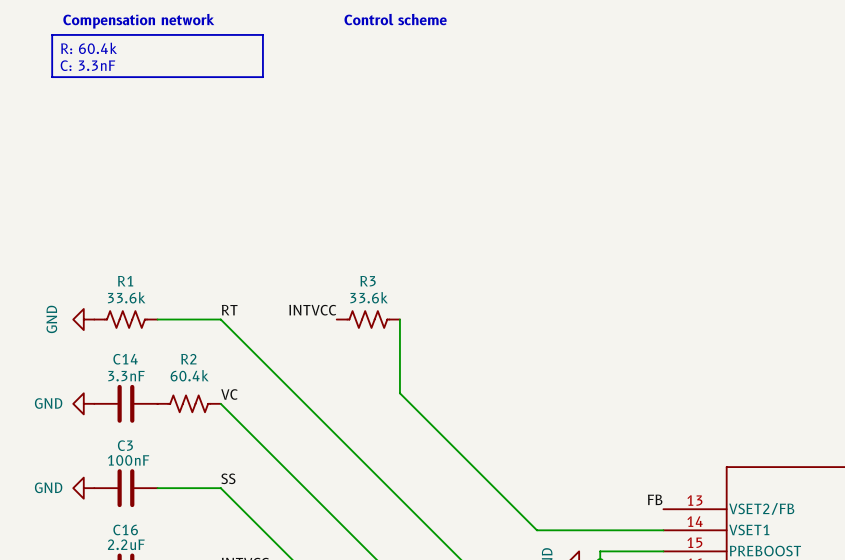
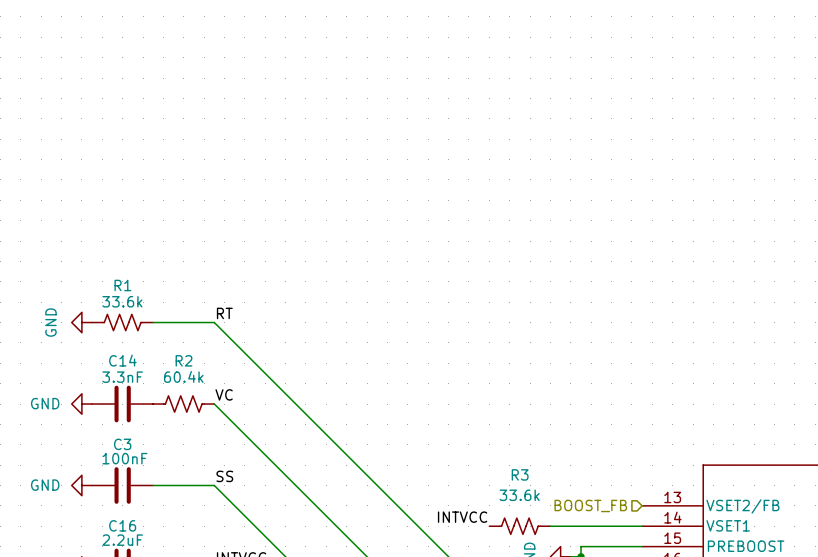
text: Control scheme (395, 19) -> none
text: Compensation network (138, 21) -> none
line: (52, 34) (262, 34) (262, 77) (52, 77) (52, 34) -> none
text: R: 60.4k (89, 48) -> none
text: C: 3.3nF (87, 65) -> none
R3 name position: R3 (368, 281) -> R3 (520, 474)
R3 value position: 33.6k (369, 297) -> 33.6k (519, 495)
label: INTVCC (312, 310) -> none
R3 position: (368, 319) -> (519, 526)
wire: (399, 319) (399, 393) (536, 530) (568, 530) -> none
label: FB (655, 499) -> none
hierarchical label: none -> BOOST_FB (590, 505)
label: none -> INTVCC (462, 517)

